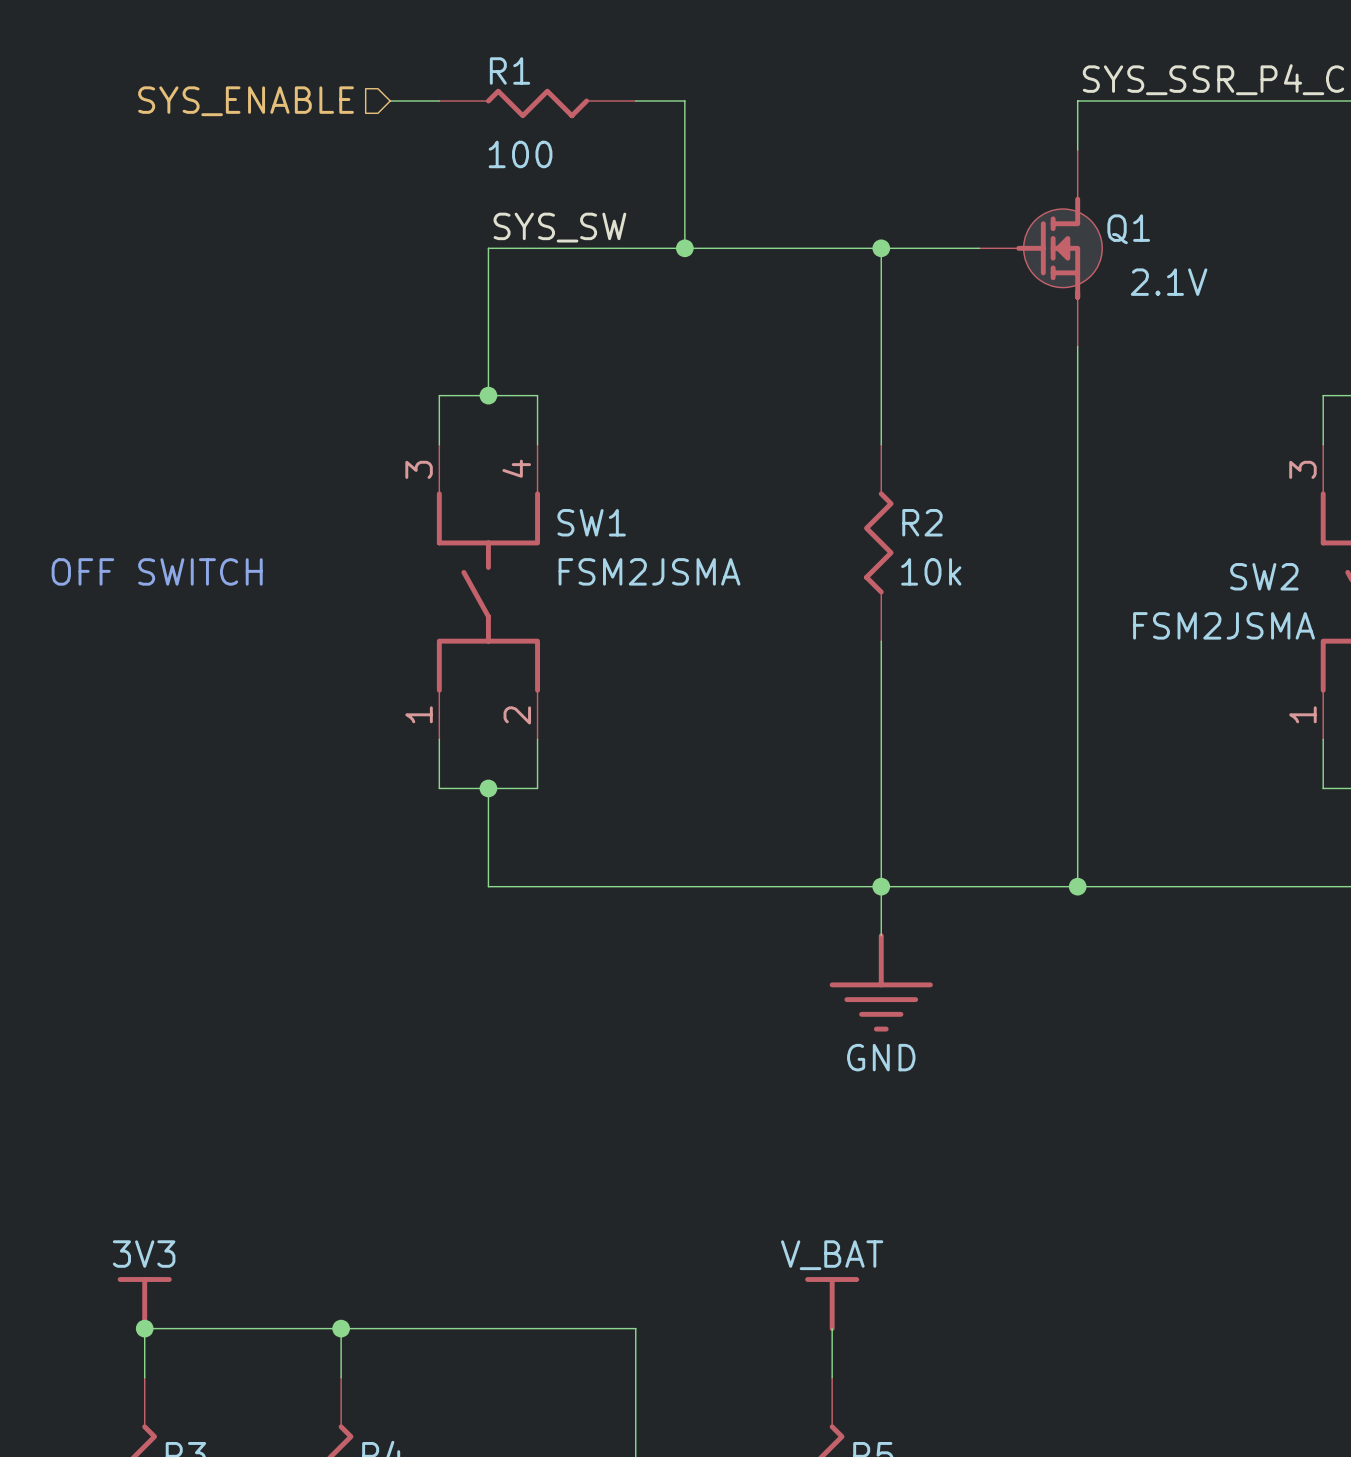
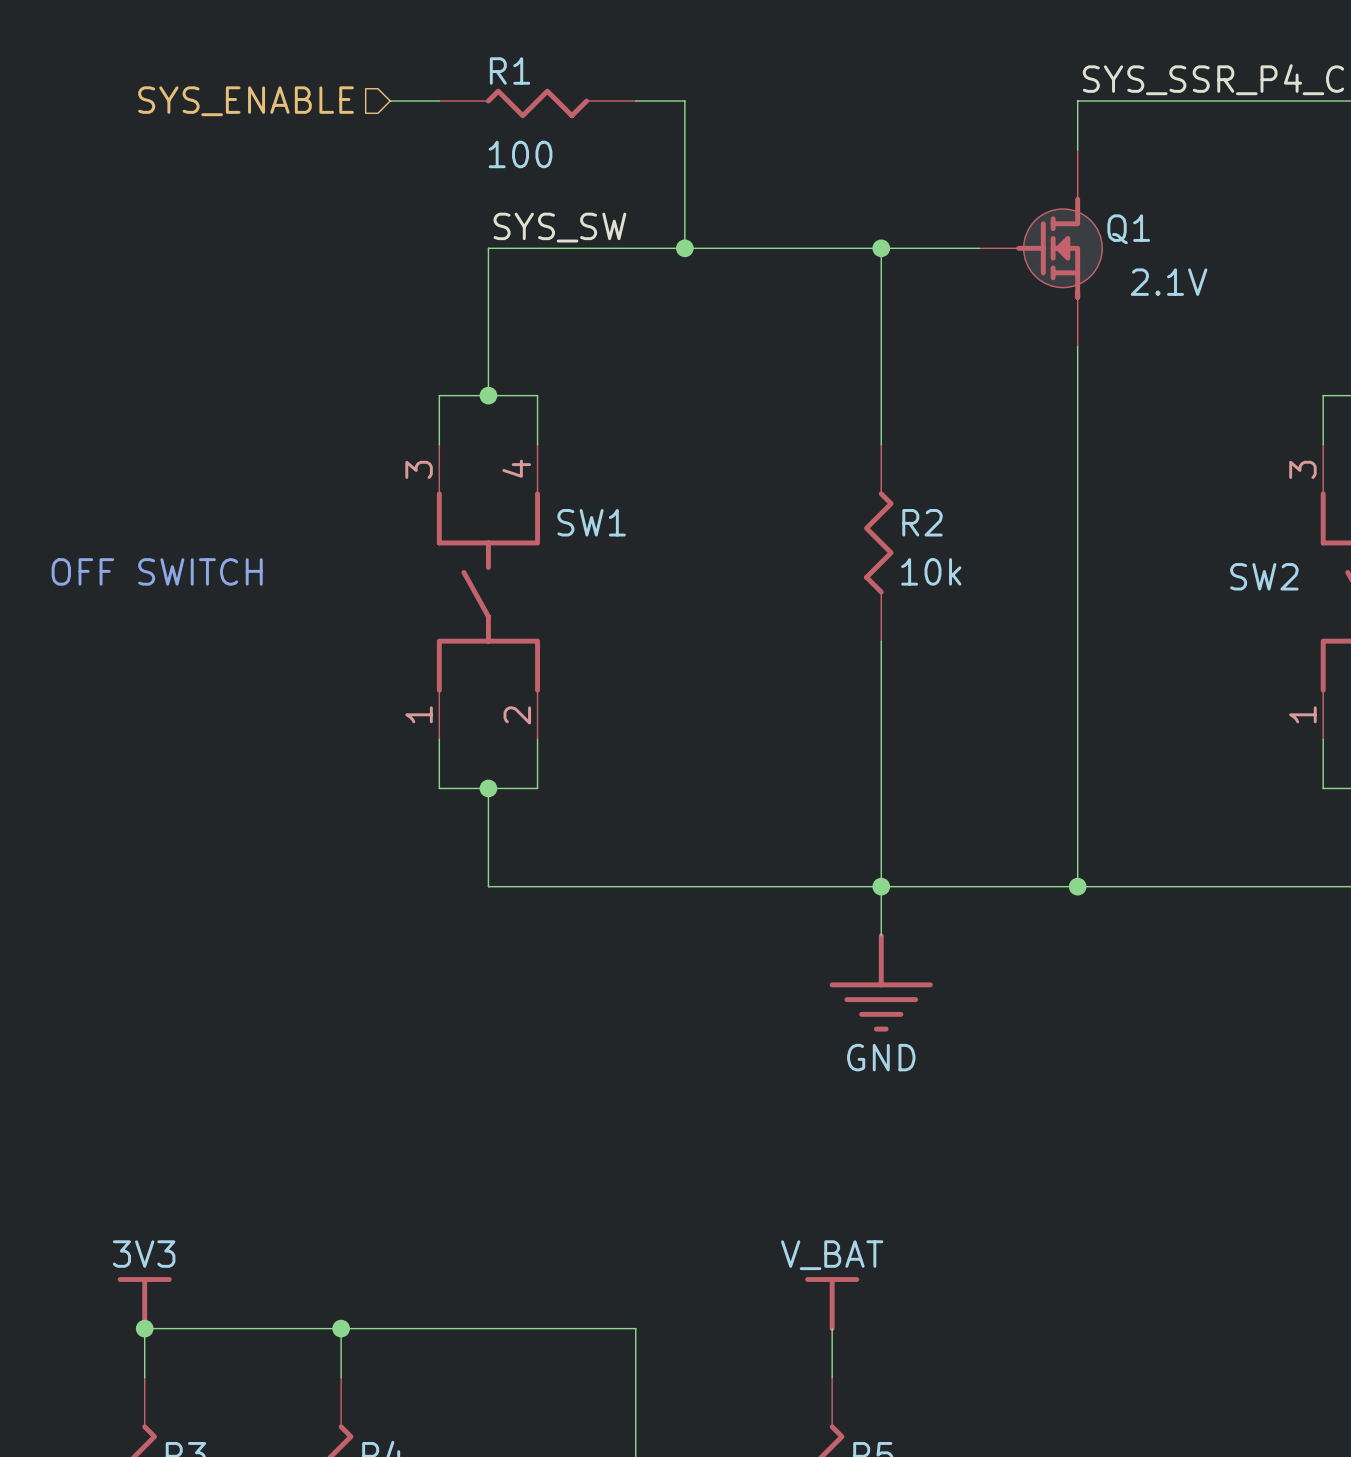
SW1 text: FSM2JSMA (649, 571) -> none
SW2 text: FSM2JSMA (1224, 625) -> none

